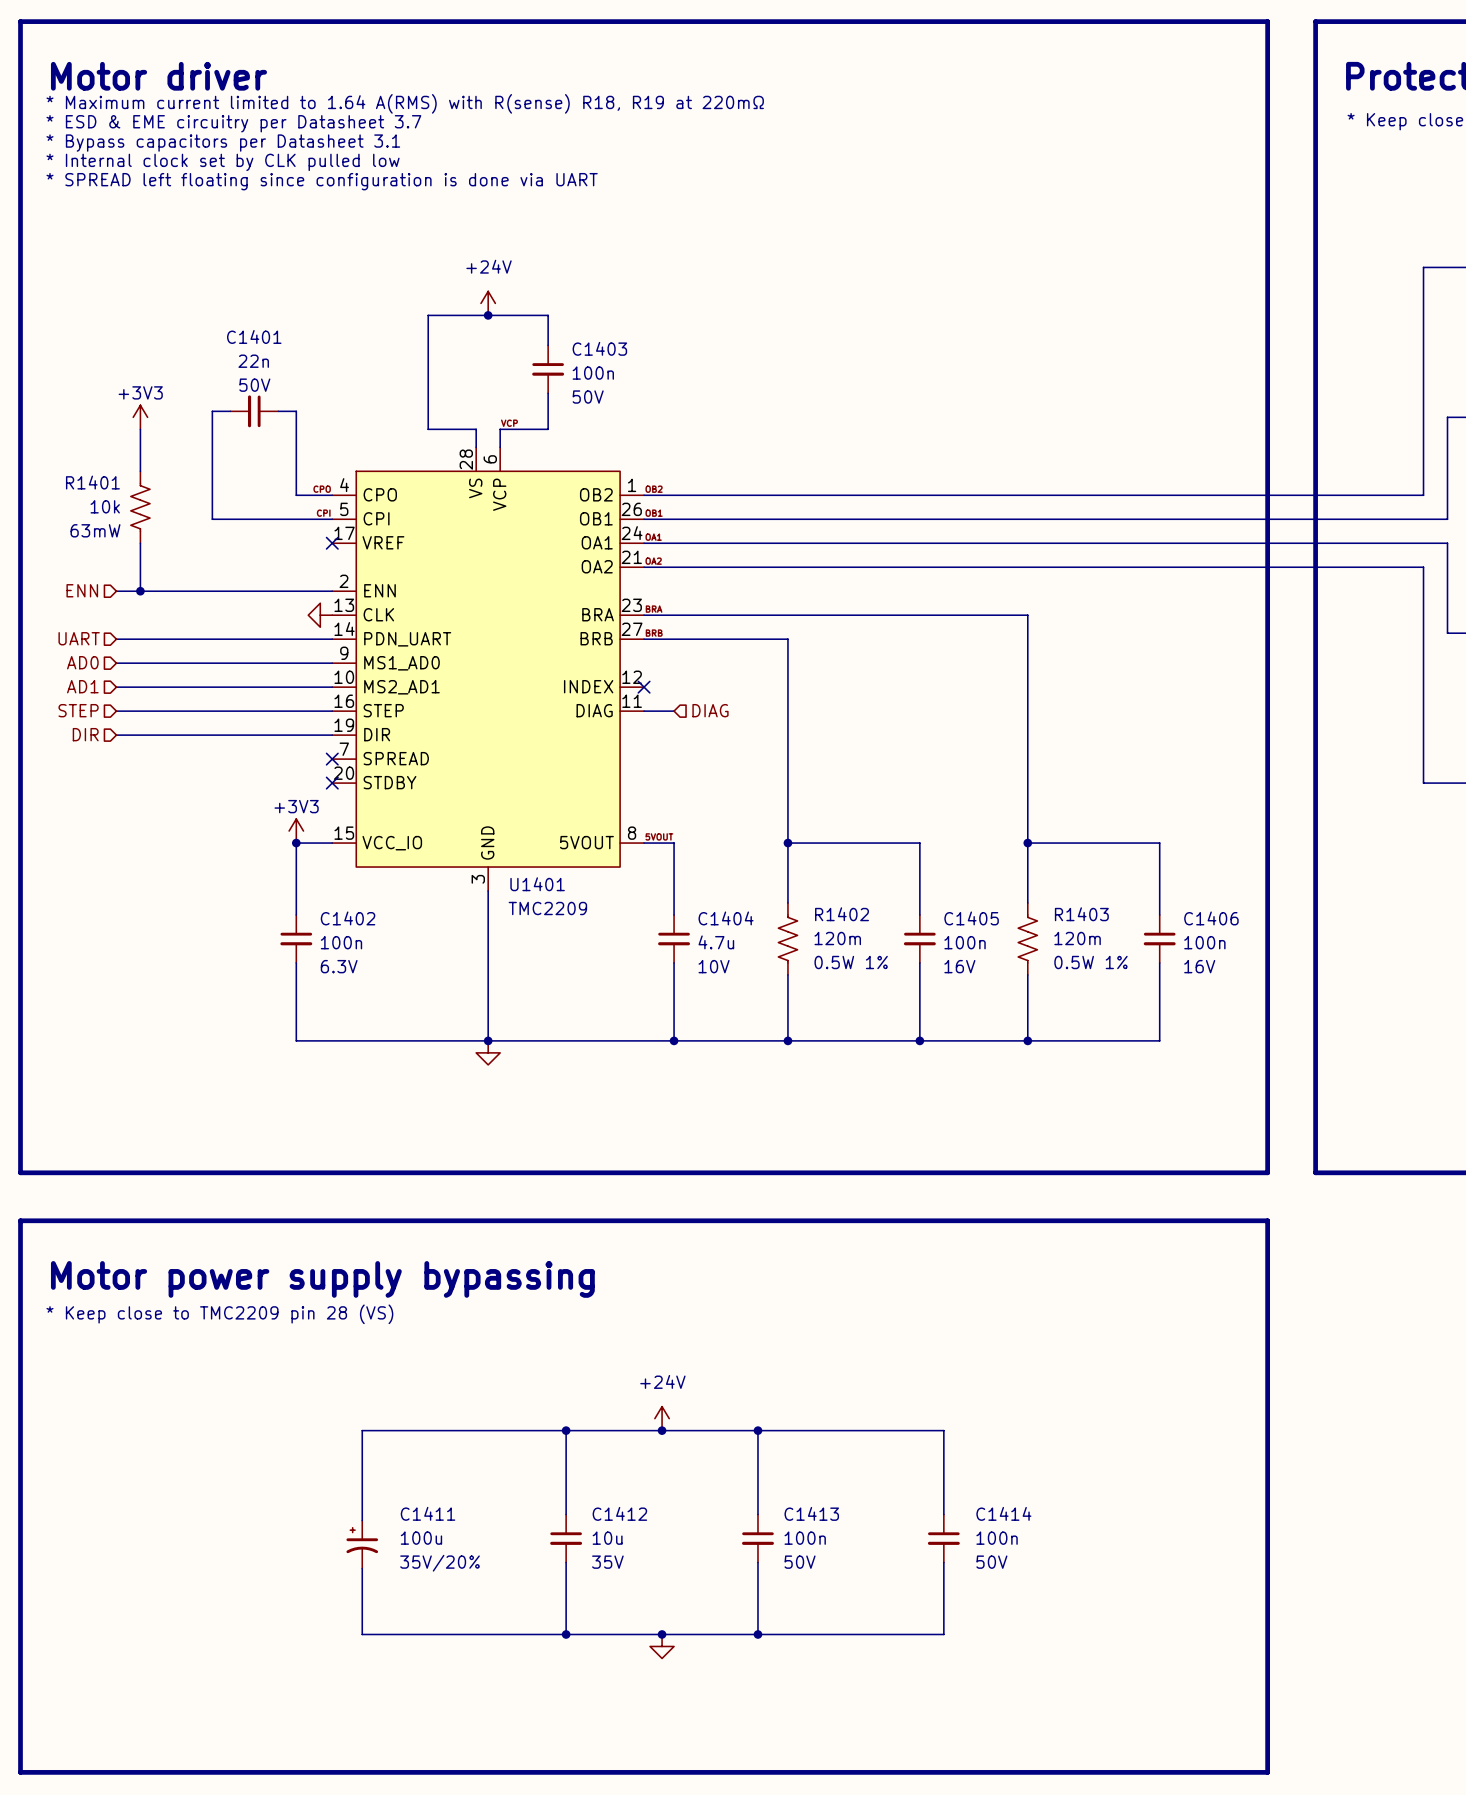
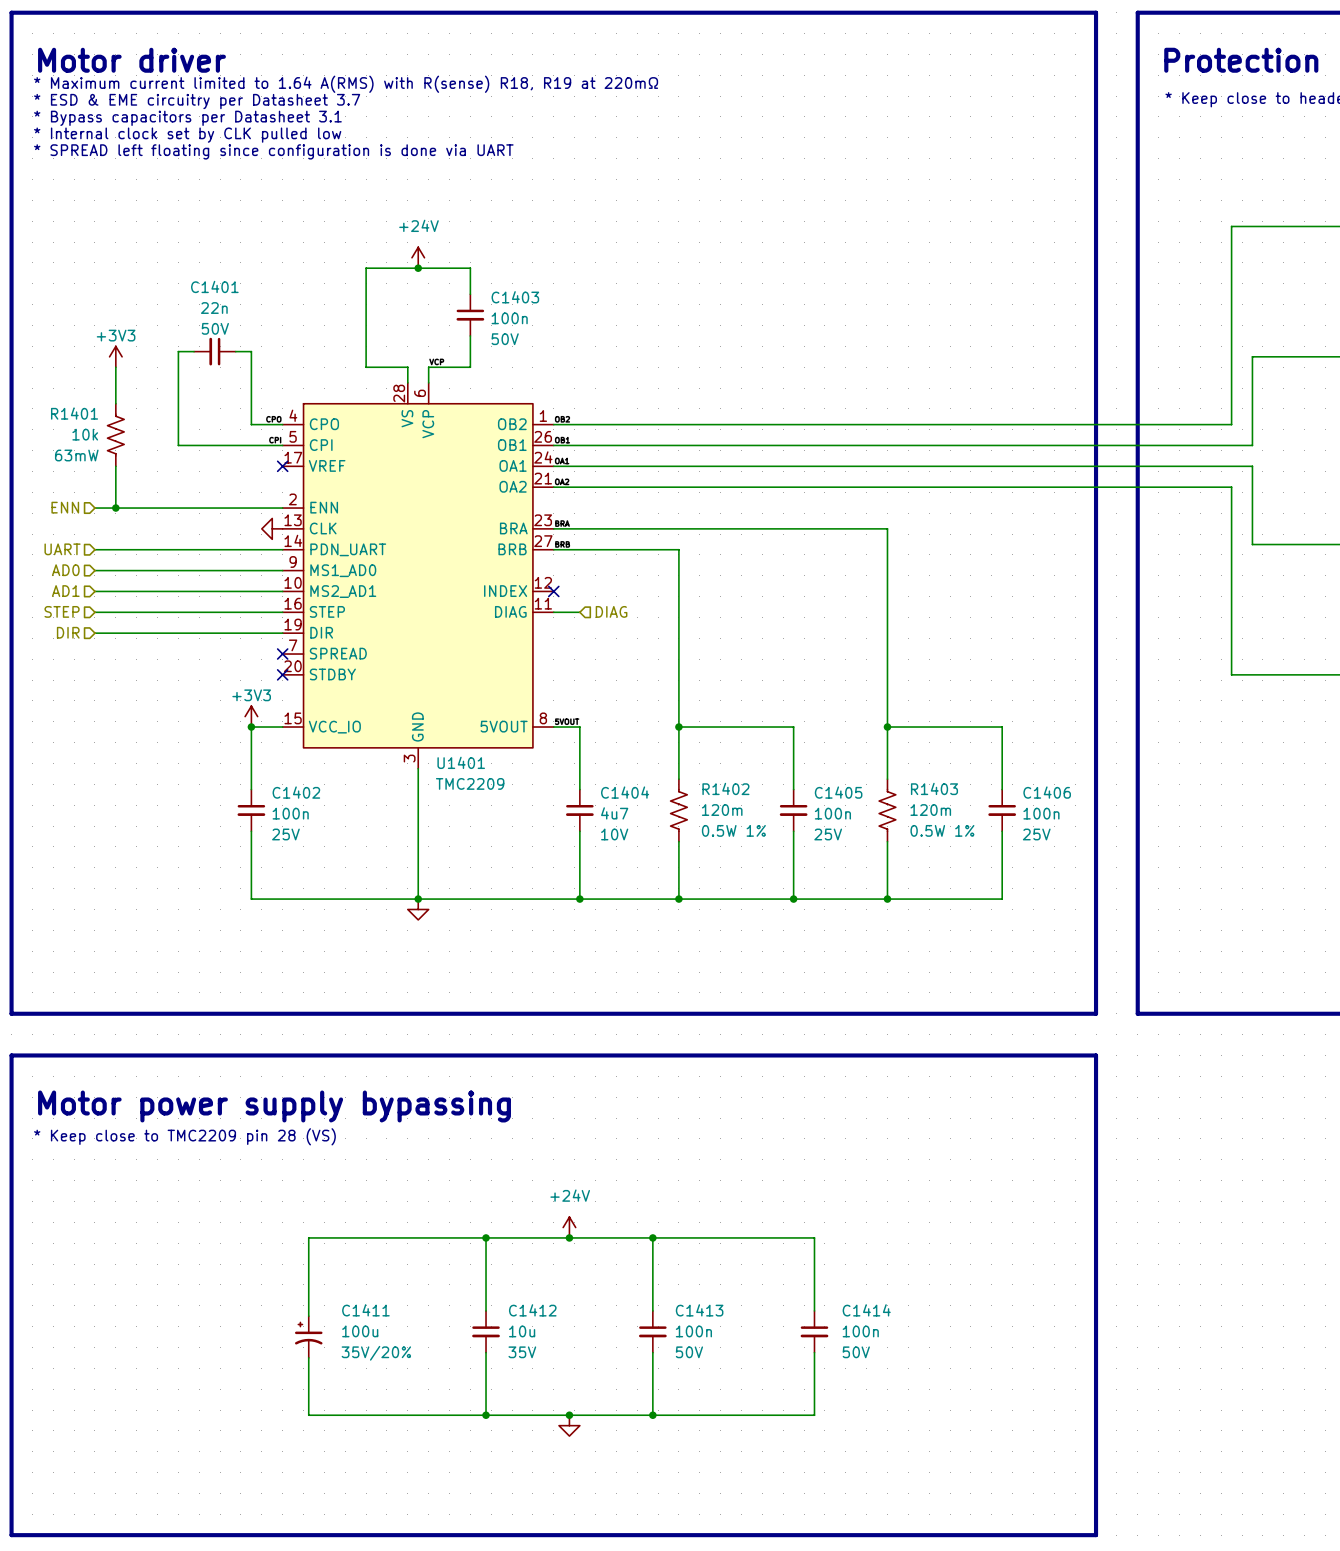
C1404 value: 4.7u (716, 942) -> 4u7 (614, 813)
C1402 text: 6.3V (339, 966) -> 25V (285, 834)
C1405 text: 16V (959, 966) -> 25V (828, 834)
C1406 text: 16V (1199, 966) -> 25V (1036, 834)

